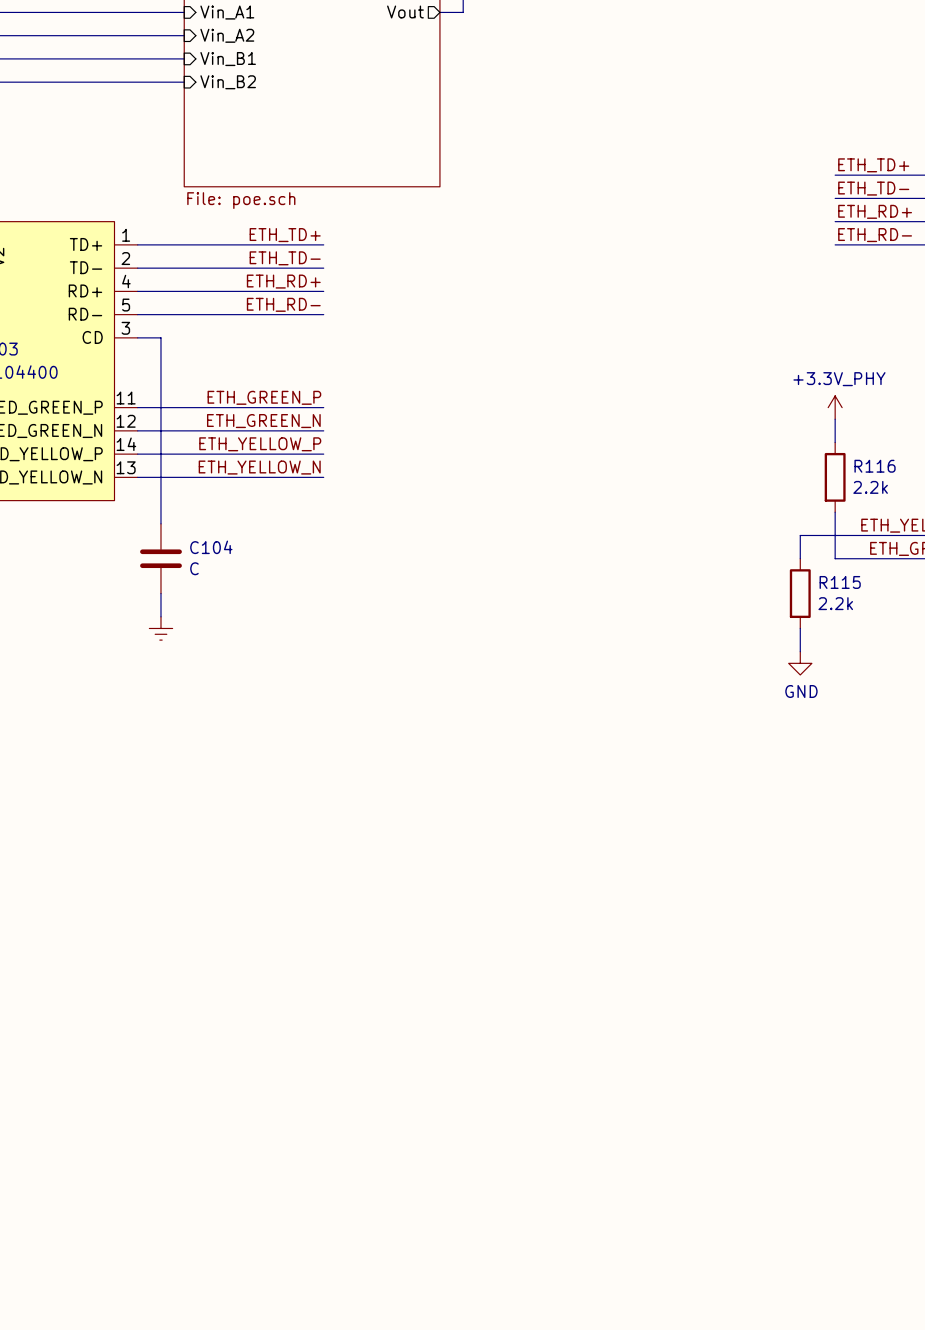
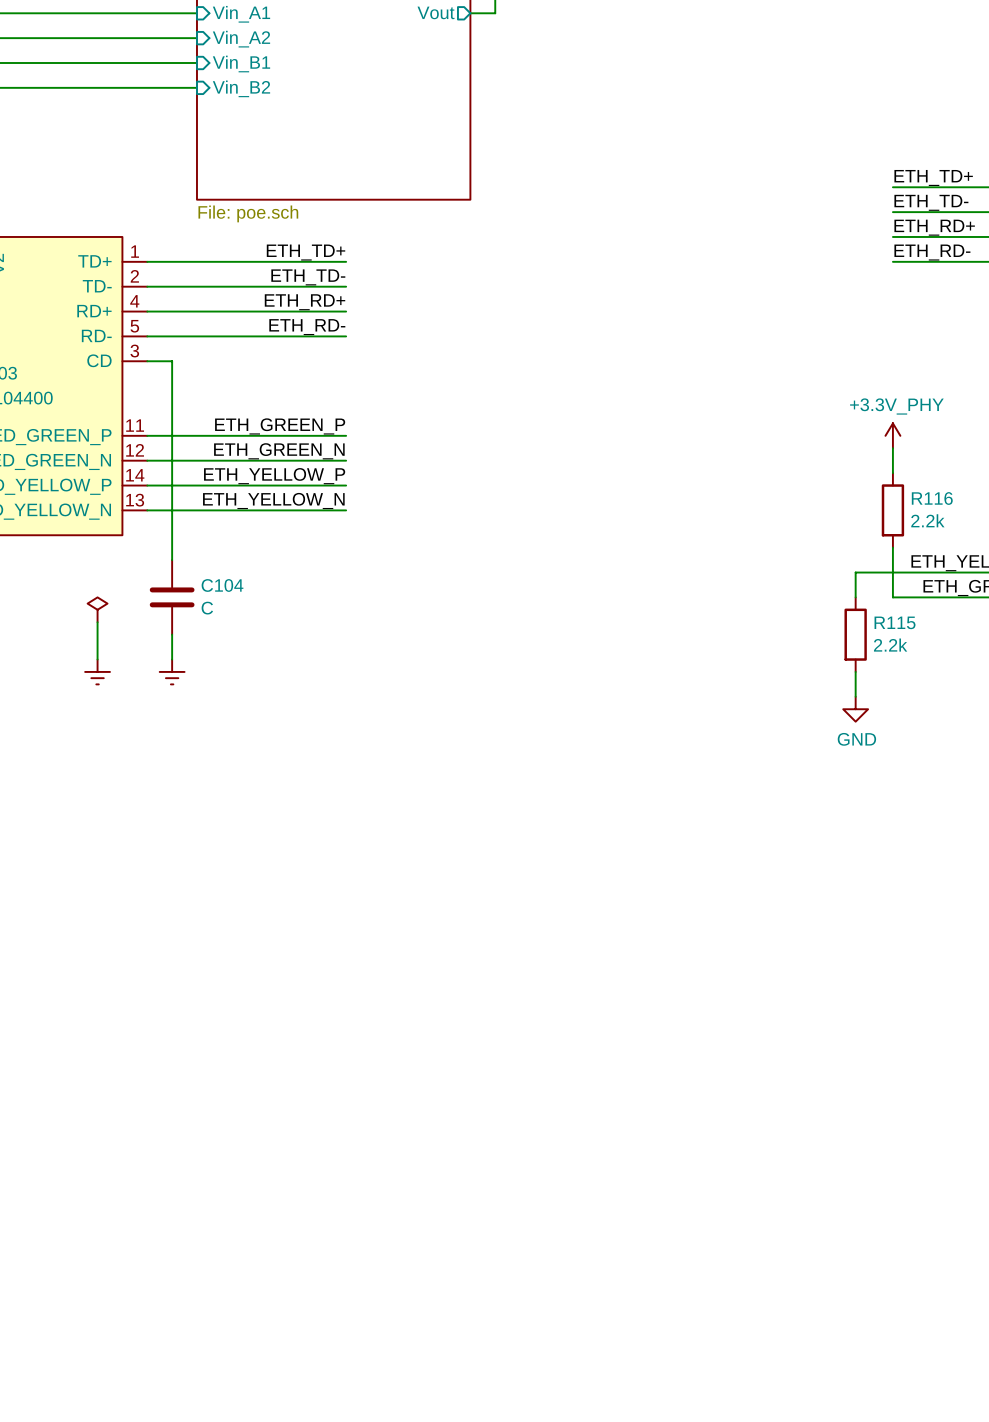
power symbol: none -> (97, 609)
wire: none -> (97, 622) (97, 659)
power symbol: none -> (97, 671)

